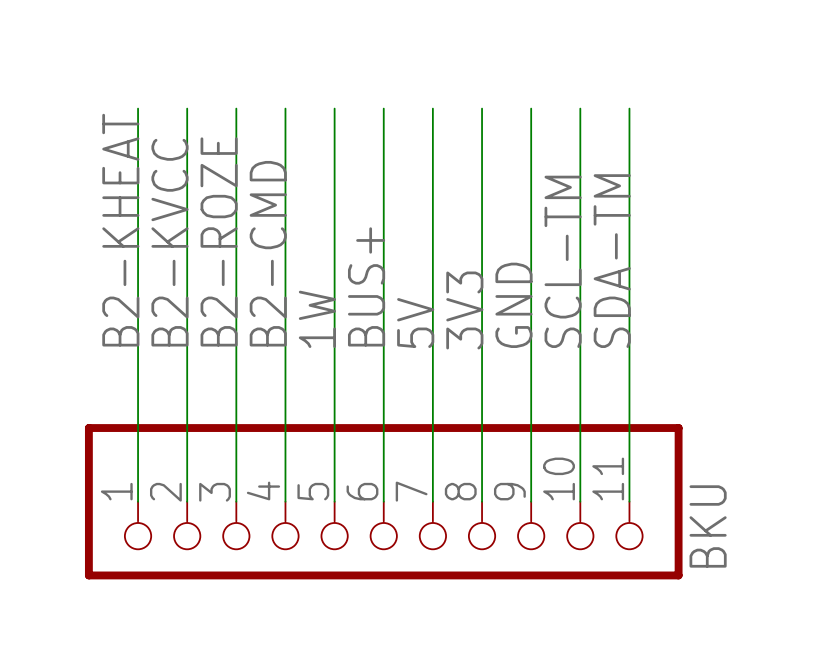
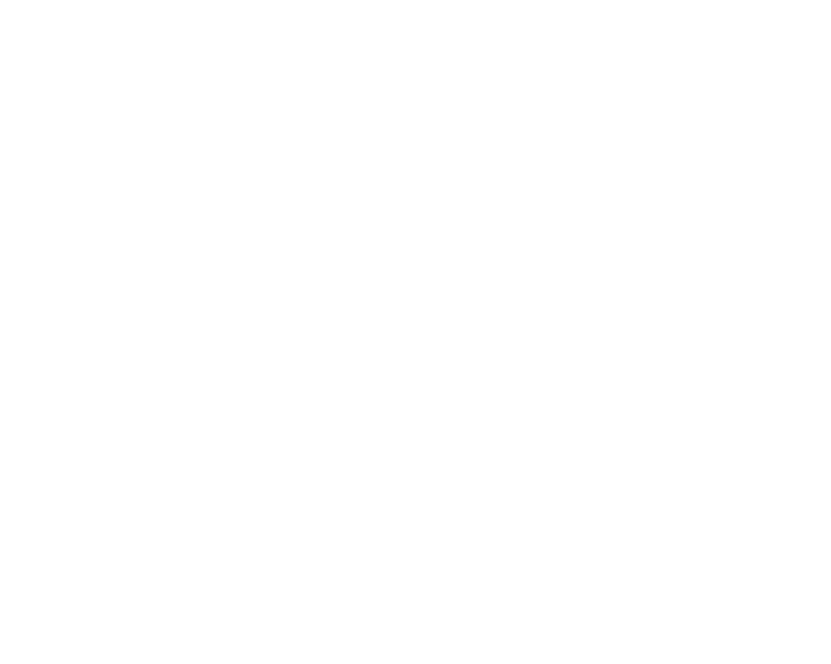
wire: (138, 108) (138, 501) -> none
wire: (187, 108) (187, 501) -> none
wire: (236, 108) (236, 501) -> none
wire: (285, 108) (285, 501) -> none
wire: (334, 108) (334, 501) -> none
wire: (383, 108) (383, 501) -> none
wire: (432, 108) (432, 501) -> none
wire: (482, 108) (482, 501) -> none
wire: (531, 108) (531, 501) -> none
wire: (580, 108) (580, 501) -> none
wire: (629, 108) (629, 501) -> none
label: B2-KHEAT (120, 230) -> none
label: B2-ROZE (219, 241) -> none
label: B2-KVCC (169, 242) -> none
label: B2-CMD (268, 253) -> none
label: SCL-TM (563, 261) -> none
label: SDA-TM (612, 261) -> none
label: BUS+ (366, 286) -> none
label: GND (513, 305) -> none
label: 3V3 (464, 310) -> none
label: 1W (317, 319) -> none
label: 5V (415, 323) -> none
BKU: (383, 501) -> none

